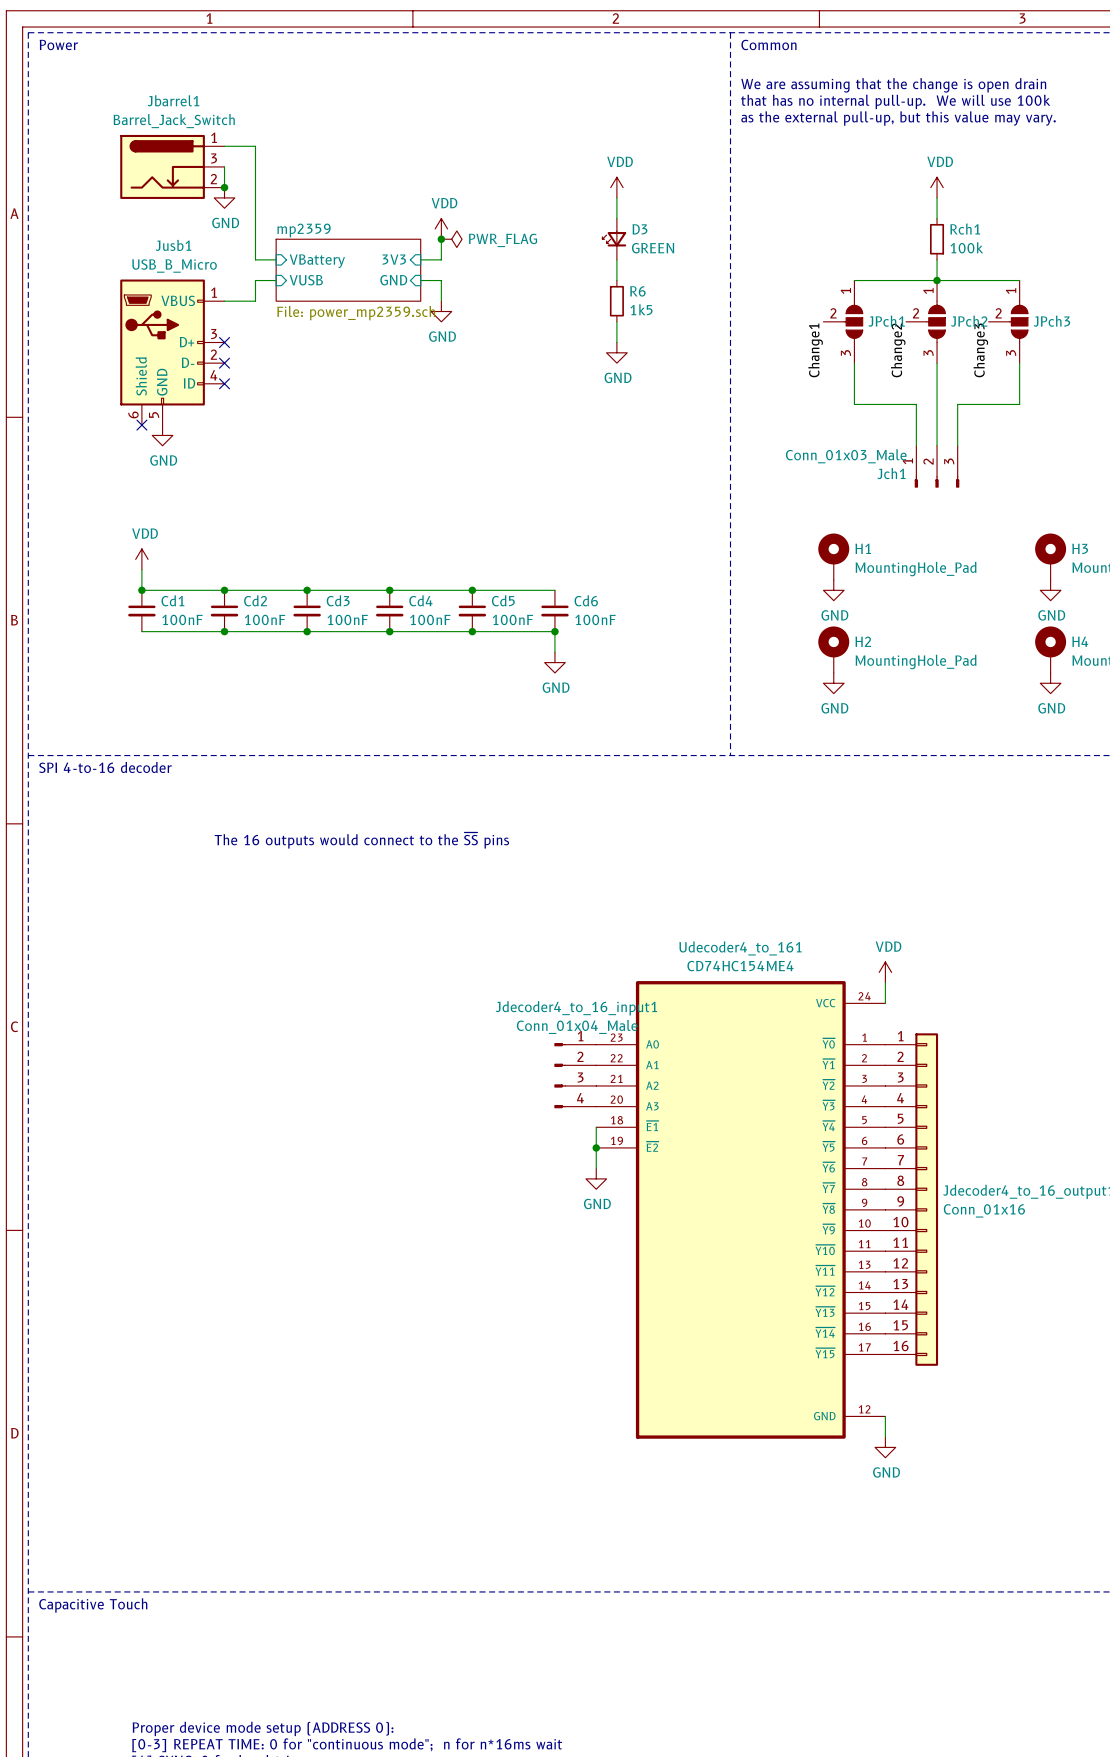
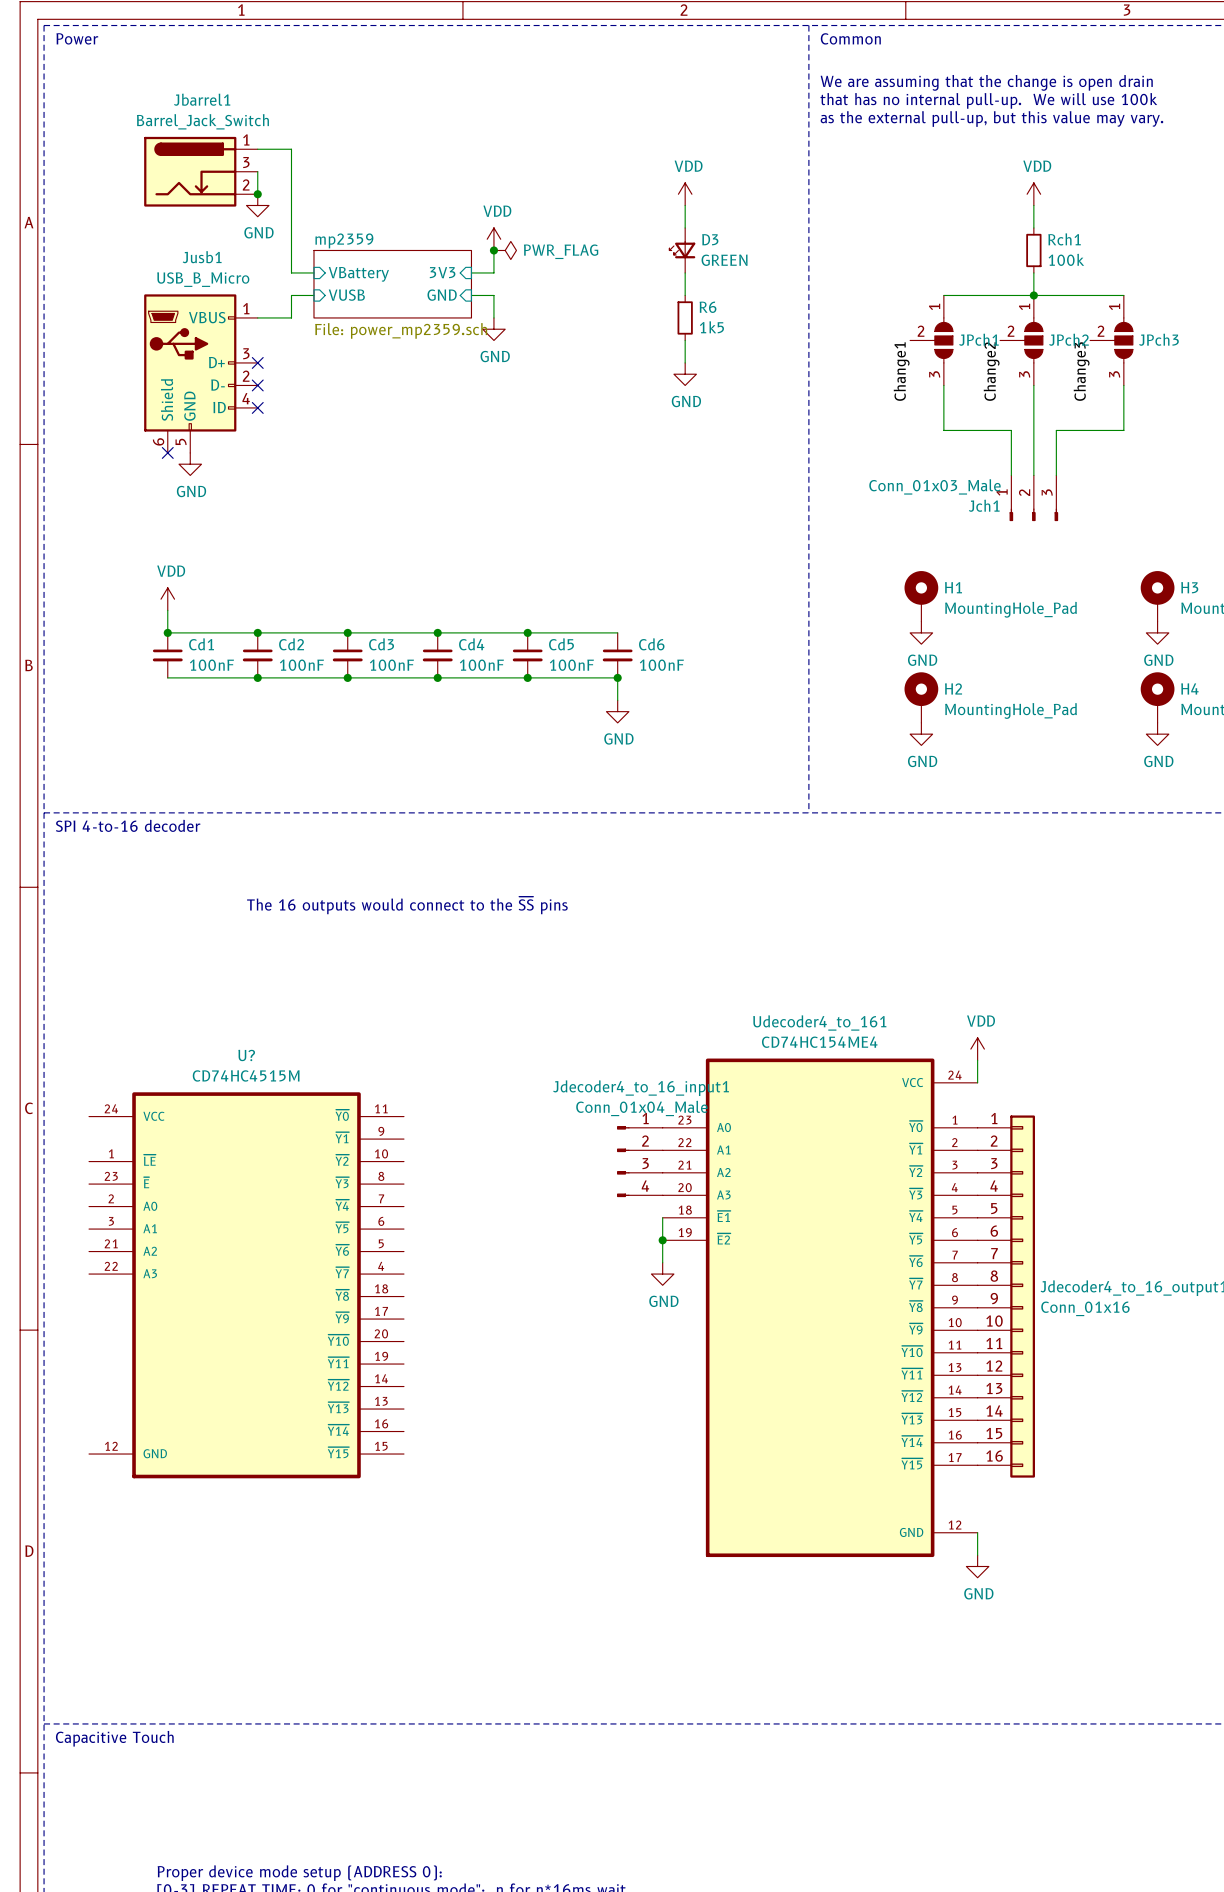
U?: none -> CD74HC4515M (246, 1285)

